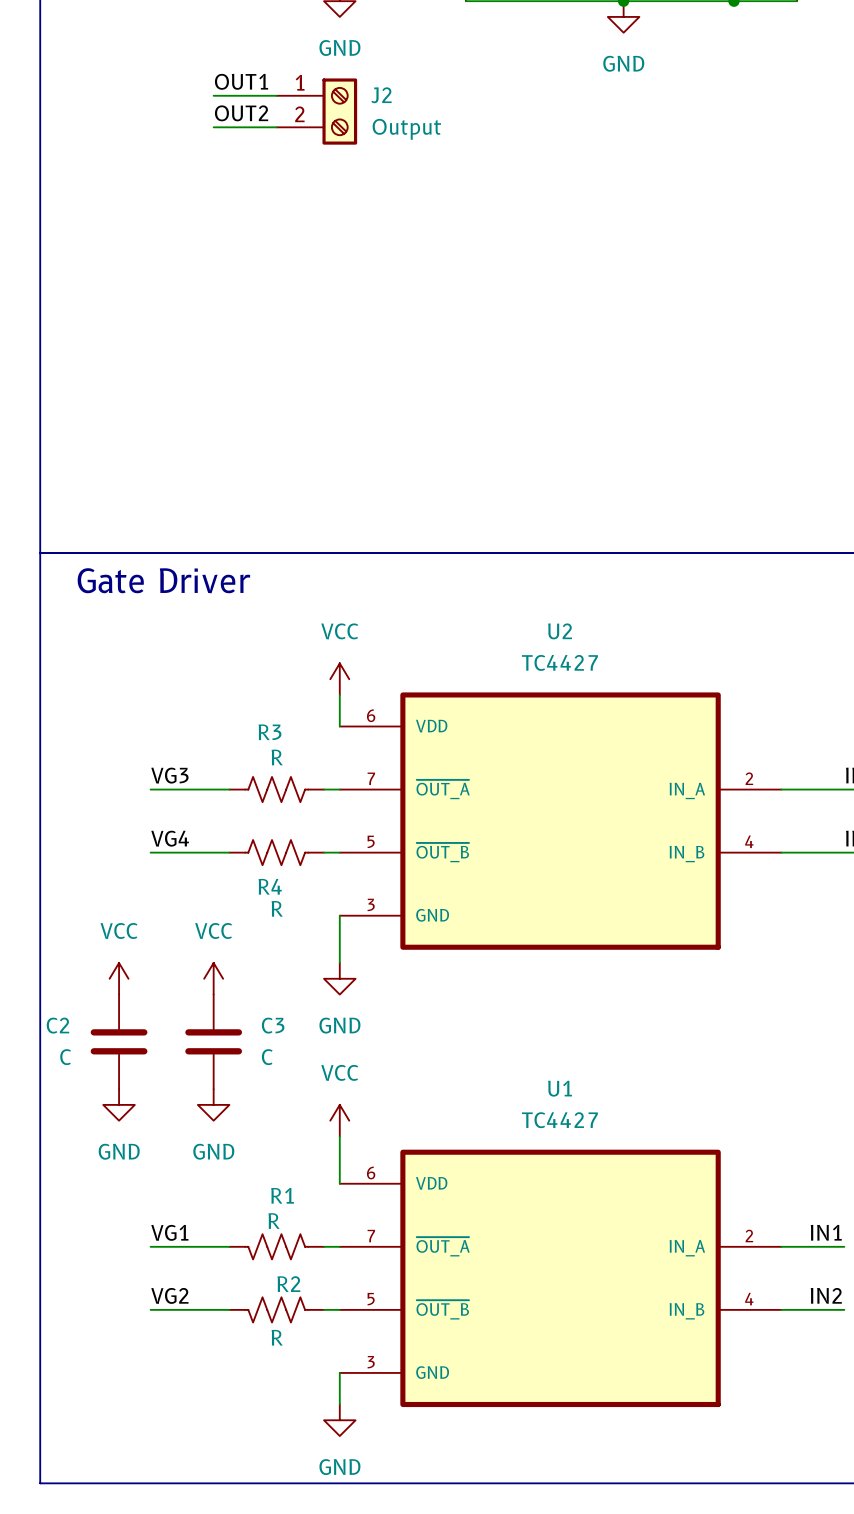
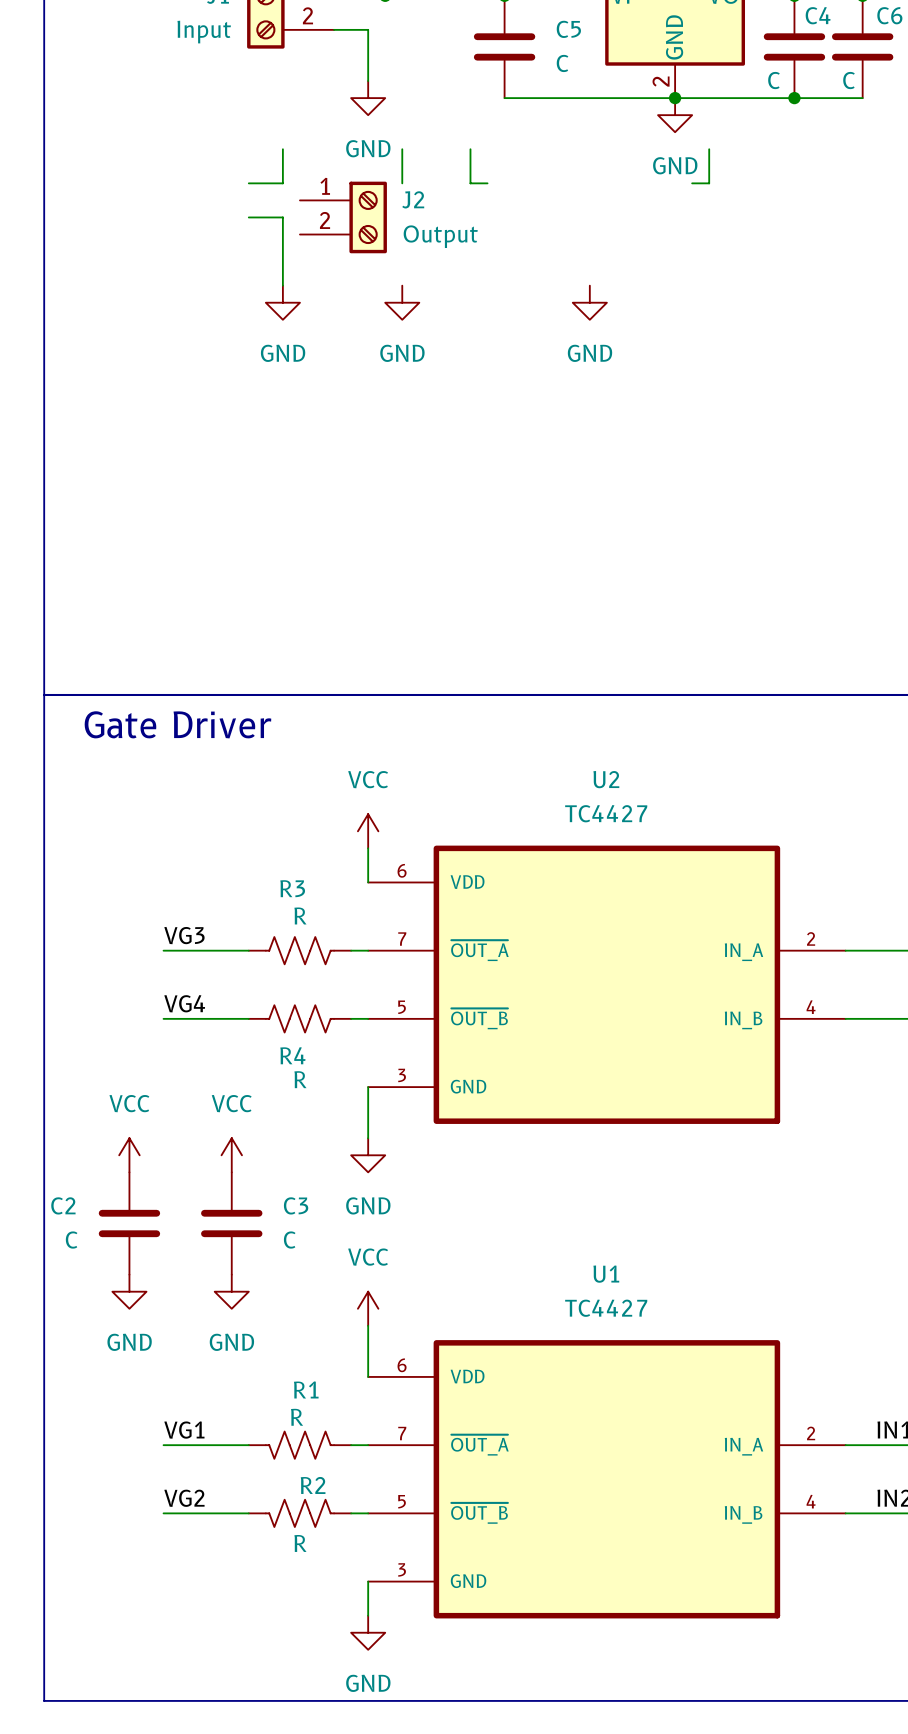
wire: none -> (282, 149) (282, 183) (248, 183)
wire: none -> (402, 149) (402, 183)
wire: none -> (470, 149) (470, 183) (487, 183)
wire: none -> (709, 149) (709, 183) (692, 183)
label: OUT1 (241, 81) -> none
wire: (213, 95) (276, 95) -> none
wire: none -> (248, 217) (282, 217) (282, 285)
label: OUT2 (241, 113) -> none
wire: (213, 127) (276, 127) -> none
power symbol: none -> GND (282, 302)
power symbol: none -> GND (402, 302)
power symbol: none -> GND (589, 302)

